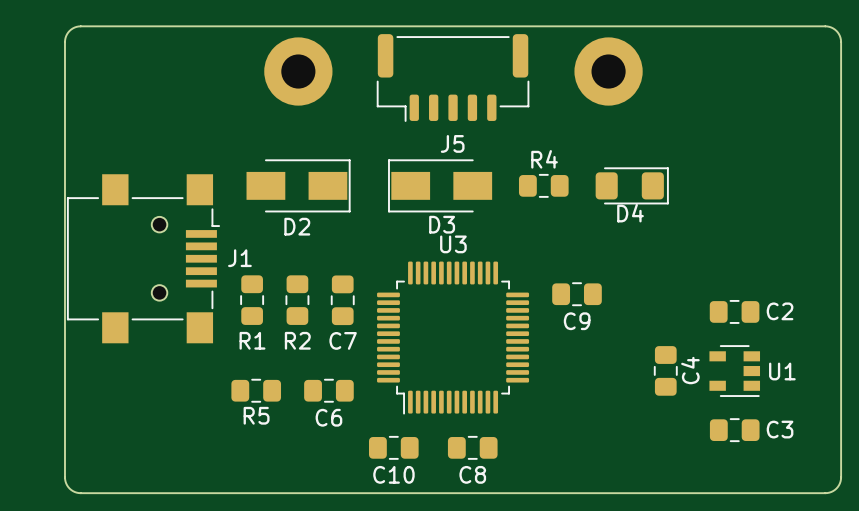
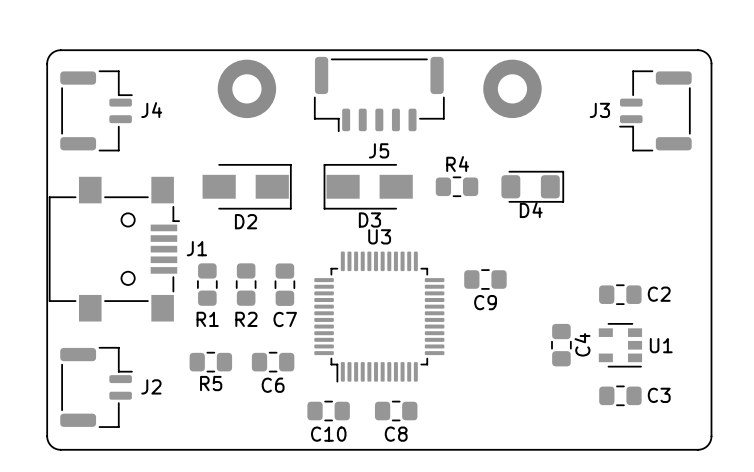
J4: none -> (96, 110)
J3: none -> (655, 110)
J2: none -> (96, 387)

